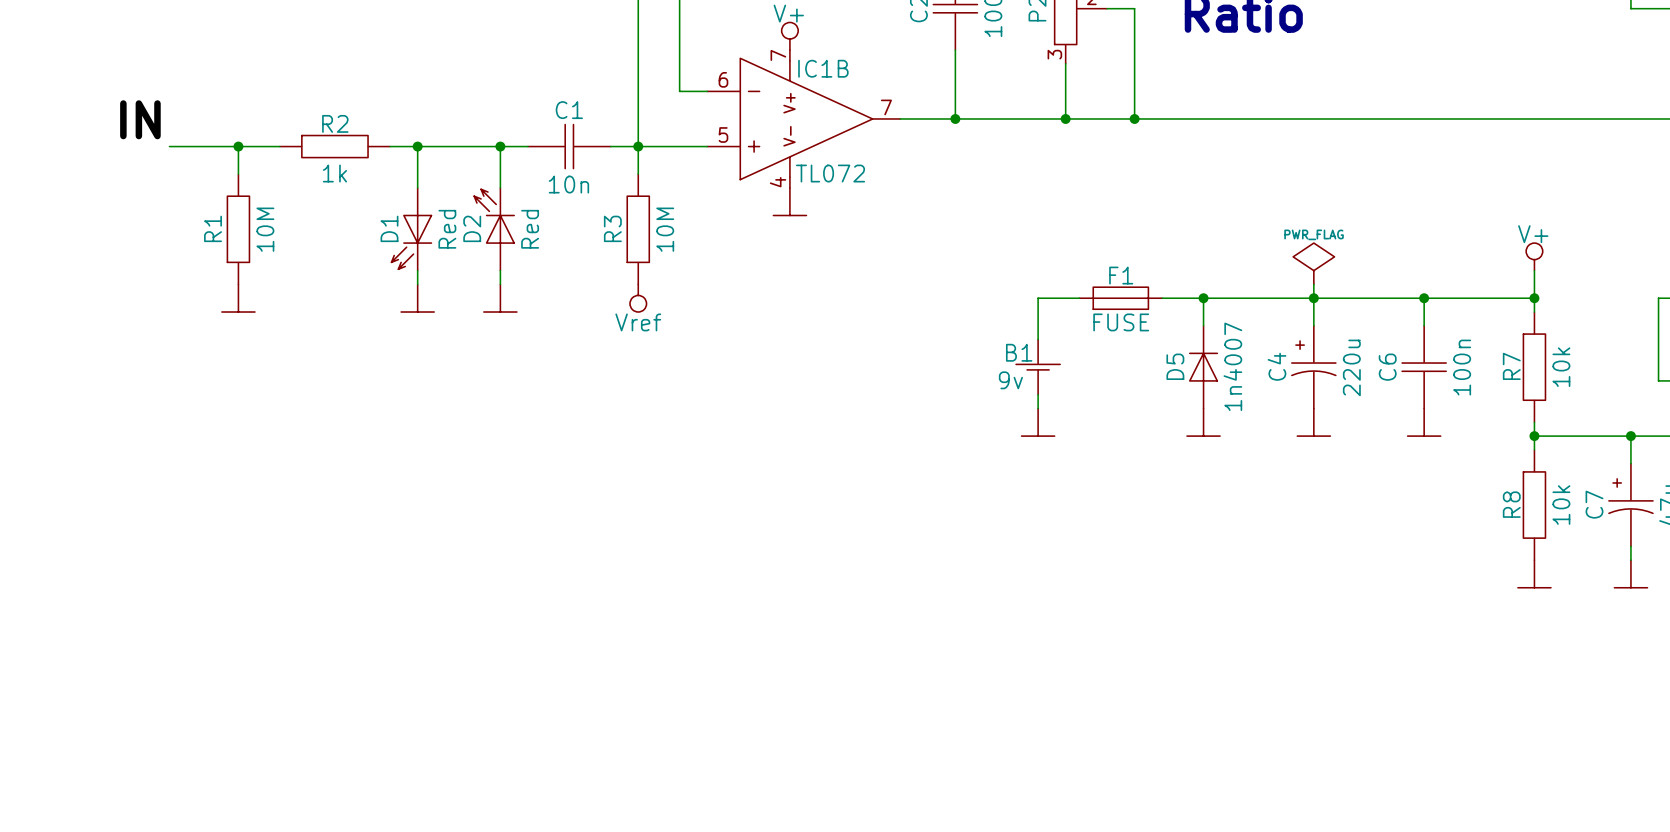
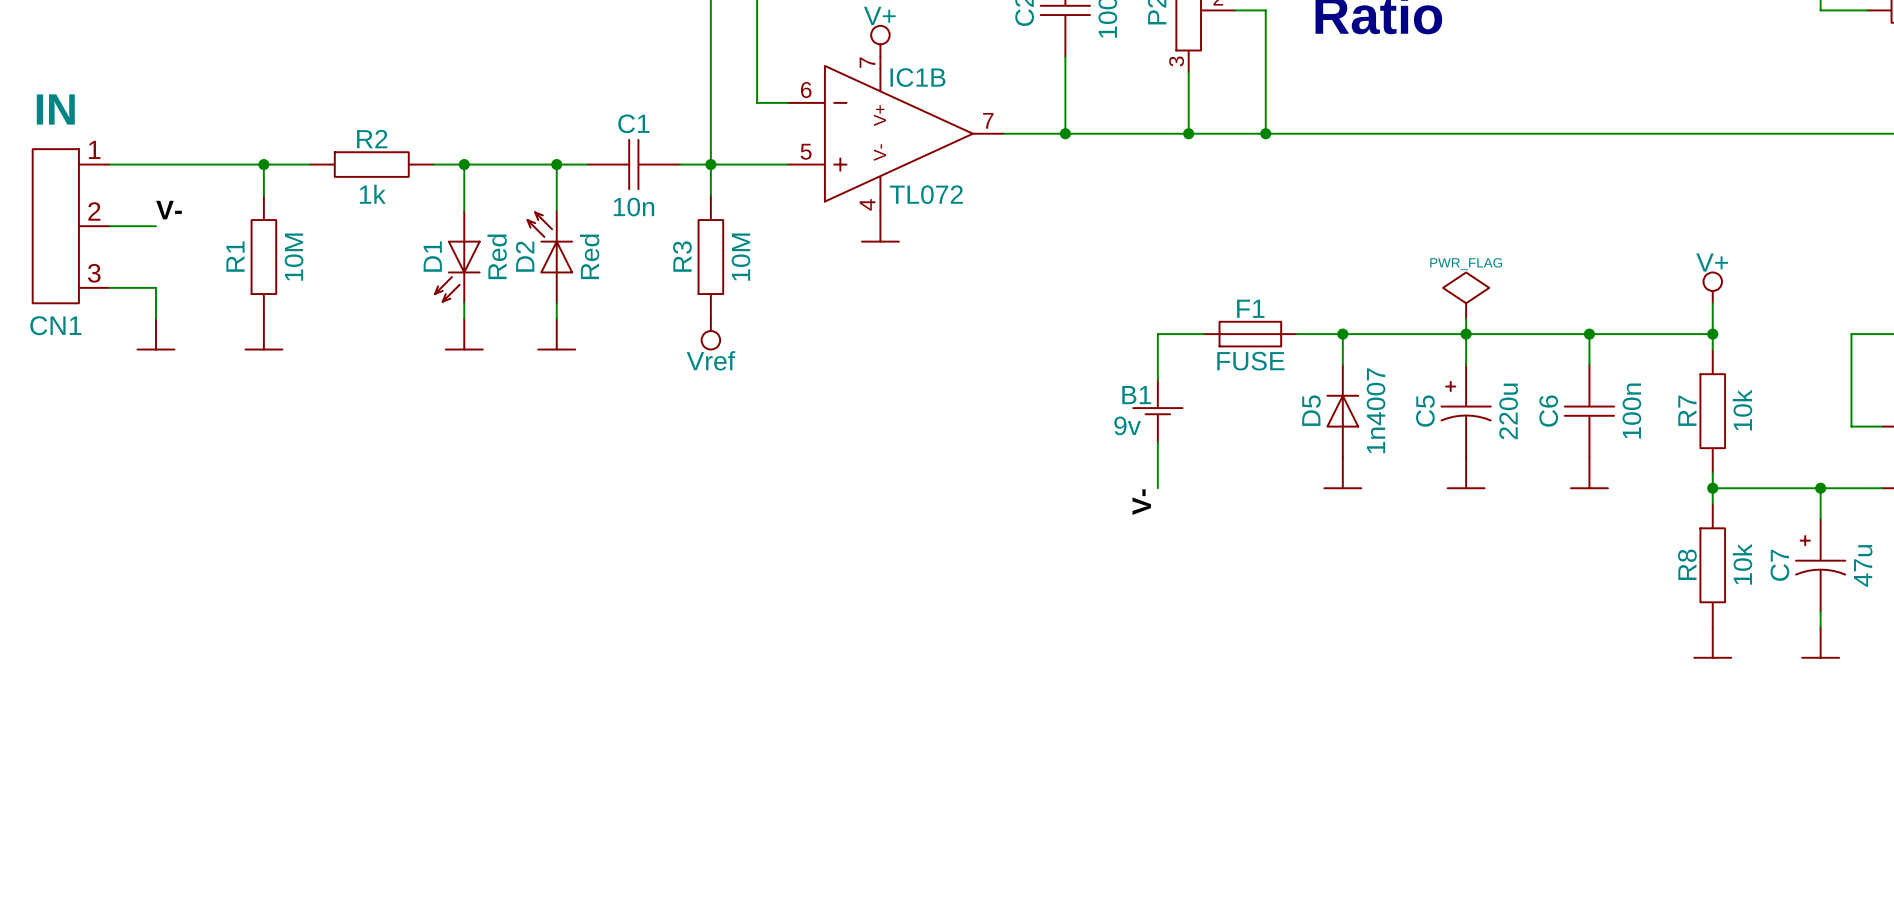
label: IN (140, 119) -> none
wire: none -> (109, 164) (186, 164)
label: none -> V- (168, 210)
CN1: none -> IN (71, 226)
wire: none -> (109, 226) (155, 226)
wire: none -> (109, 287) (155, 287) (155, 318)
power symbol: none -> (155, 334)
C4 name: C4 (1277, 366) -> C5 (1425, 411)
power symbol: (1038, 422) -> none
label: none -> V- (1141, 502)

